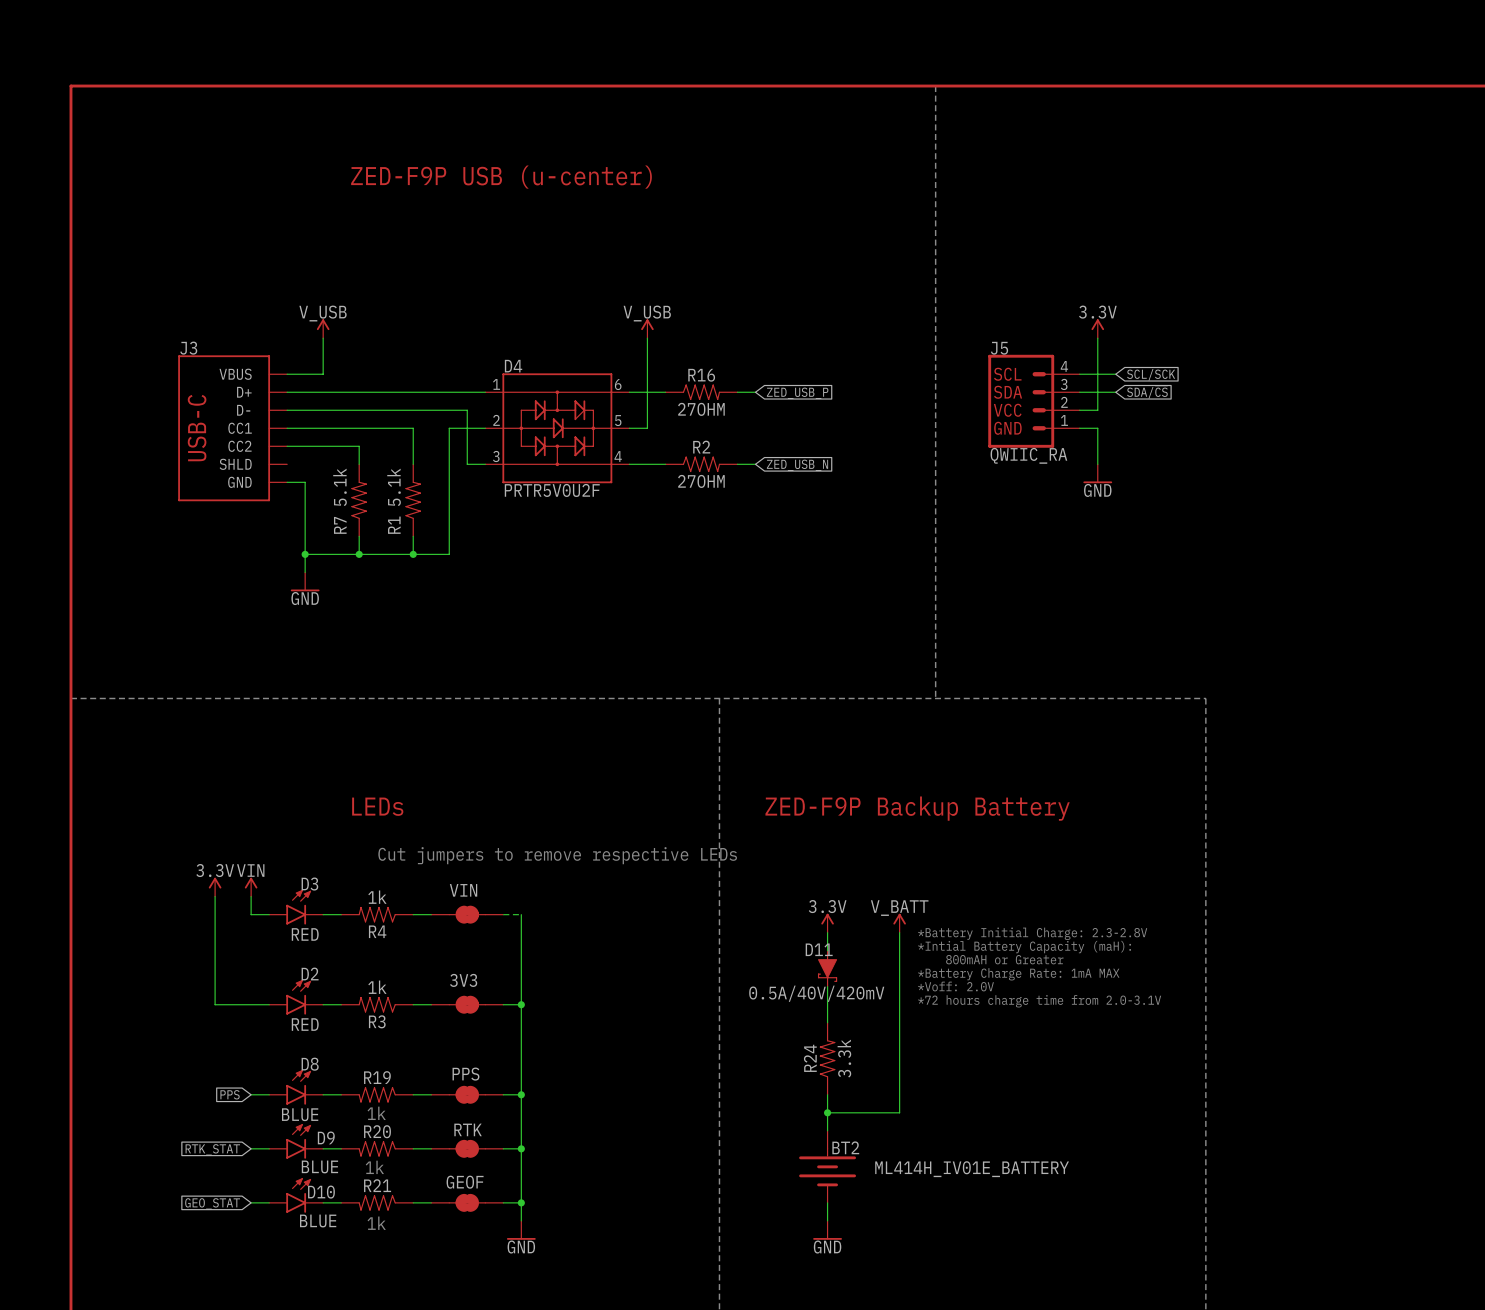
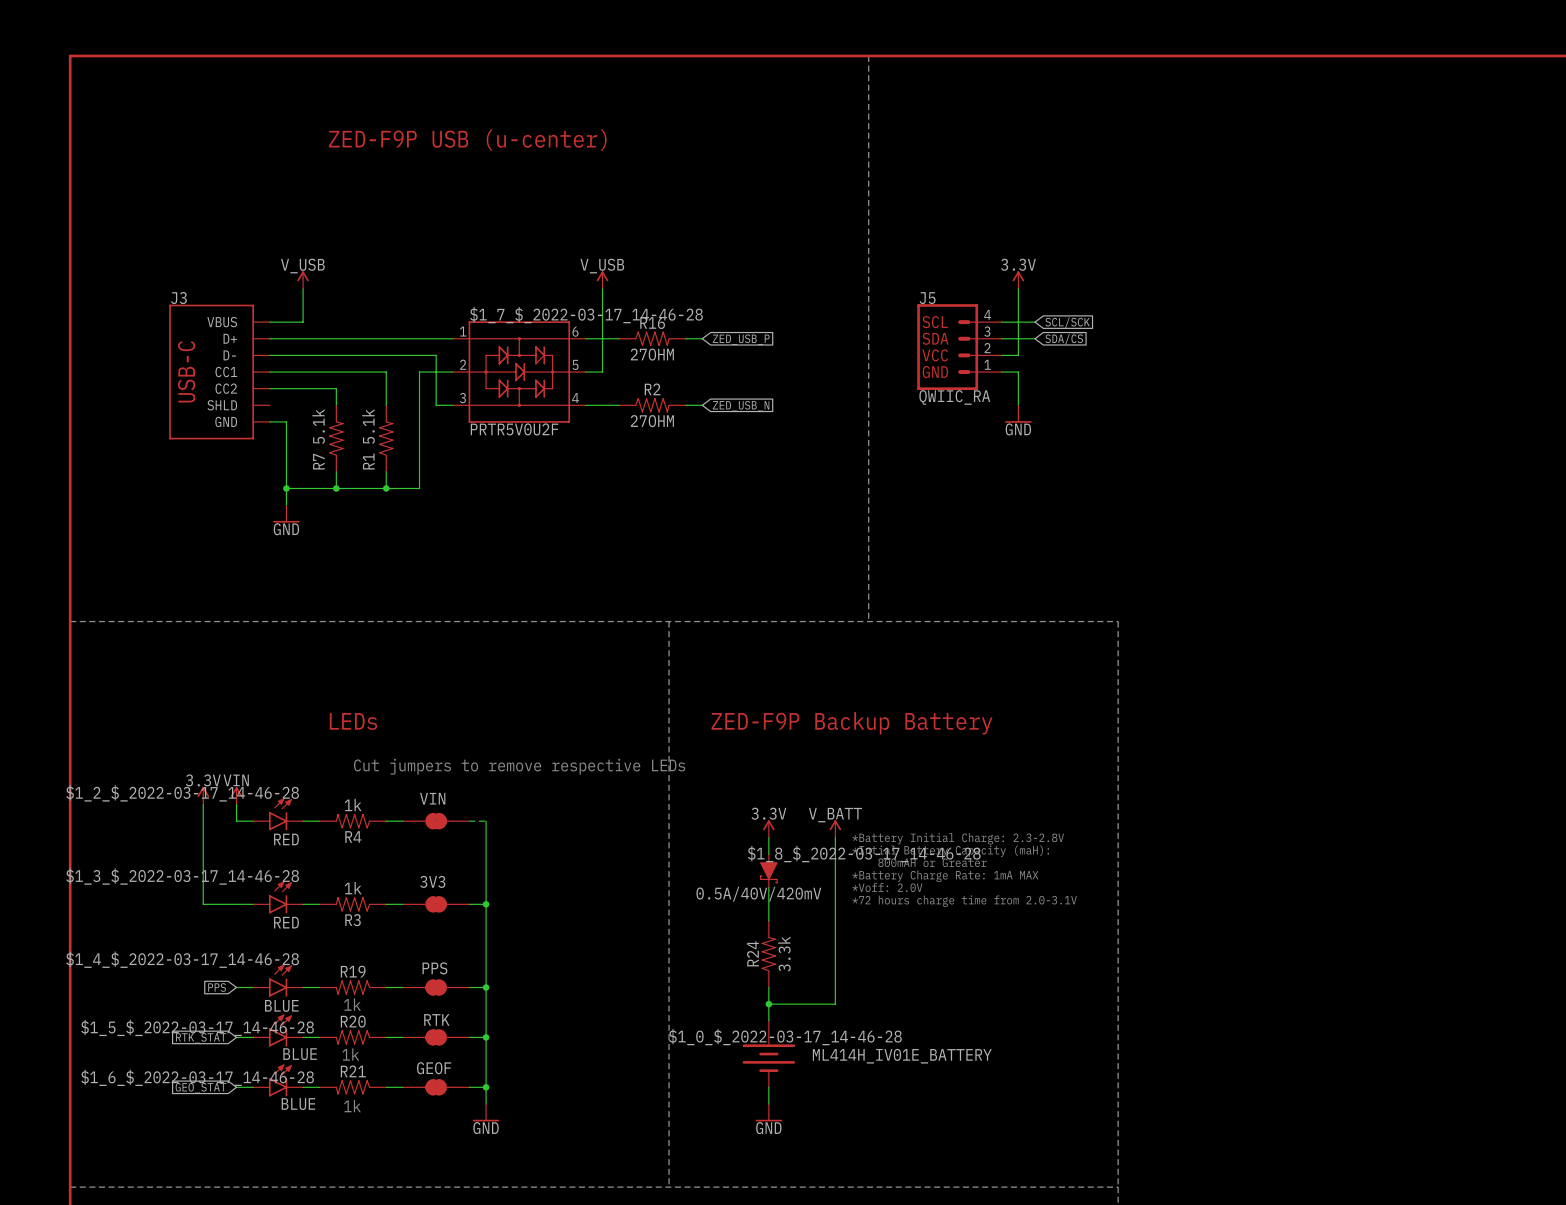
D4 name: D4 (513, 366) -> $1_7_$_2022-03-17_14-46-28 (586, 315)
D3 name: D3 (309, 884) -> $1_2_$_2022-03-17_14-46-28 (182, 793)
D11 name: D11 (819, 949) -> $1_8_$_2022-03-17_14-46-28 (864, 854)
D2 name: D2 (310, 974) -> $1_3_$_2022-03-17_14-46-28 (182, 876)
D8 name: D8 (310, 1064) -> $1_4_$_2022-03-17_14-46-28 (182, 959)
D9 name: D9 (326, 1137) -> $1_5_$_2022-03-17_14-46-28 (197, 1027)
BT2 name: BT2 (845, 1147) -> $1_0_$_2022-03-17_14-46-28 (785, 1037)
D10 name: D10 (321, 1192) -> $1_6_$_2022-03-17_14-46-28 (197, 1077)

